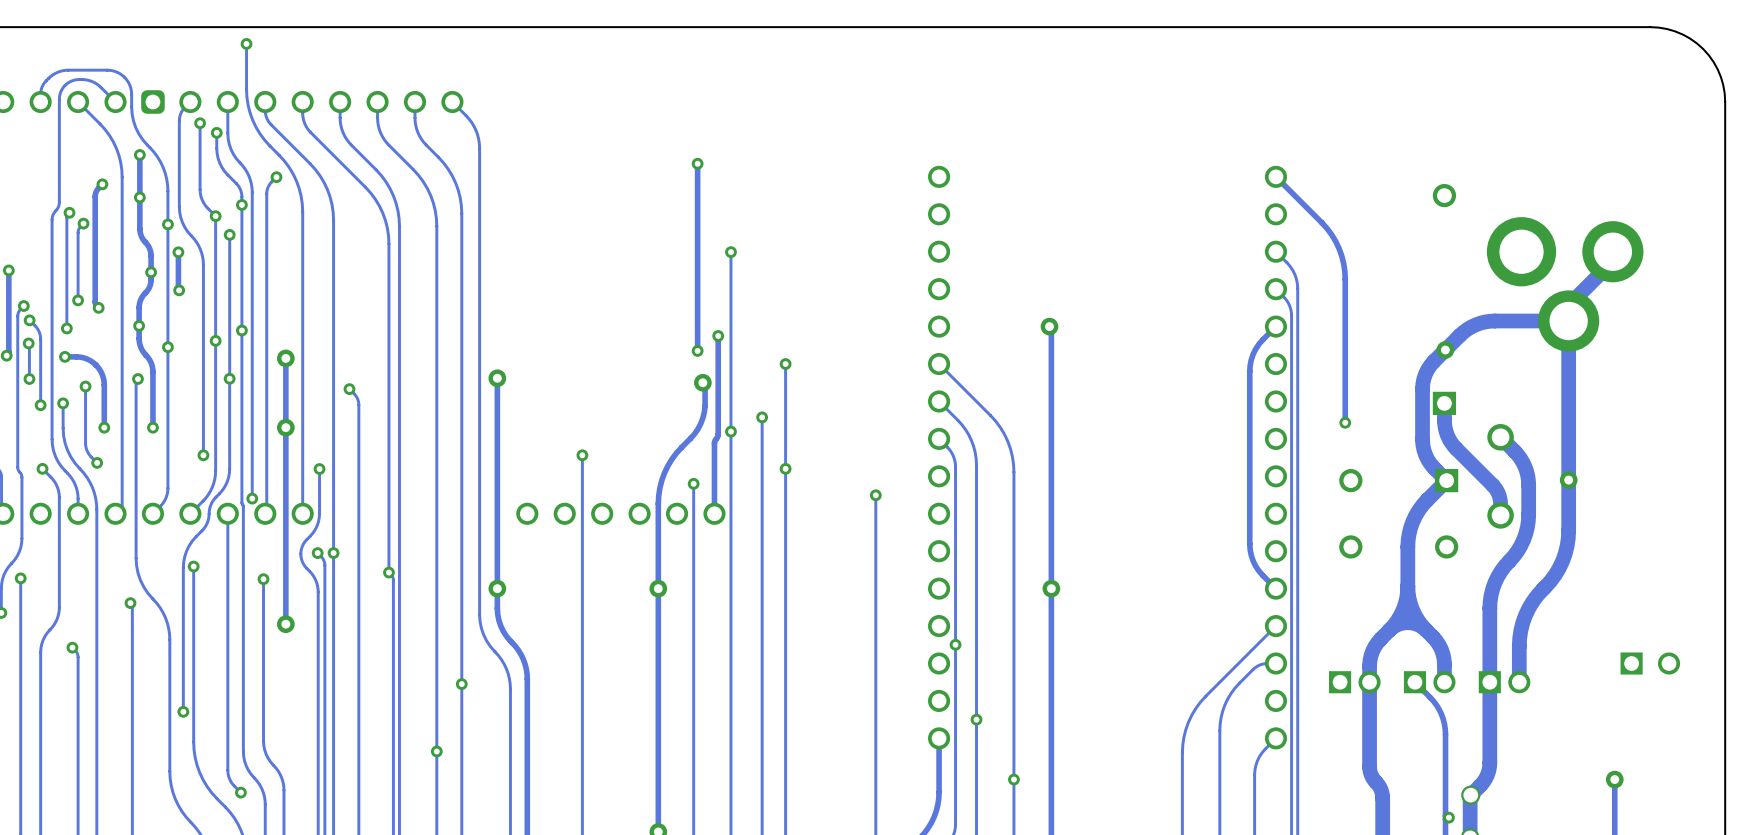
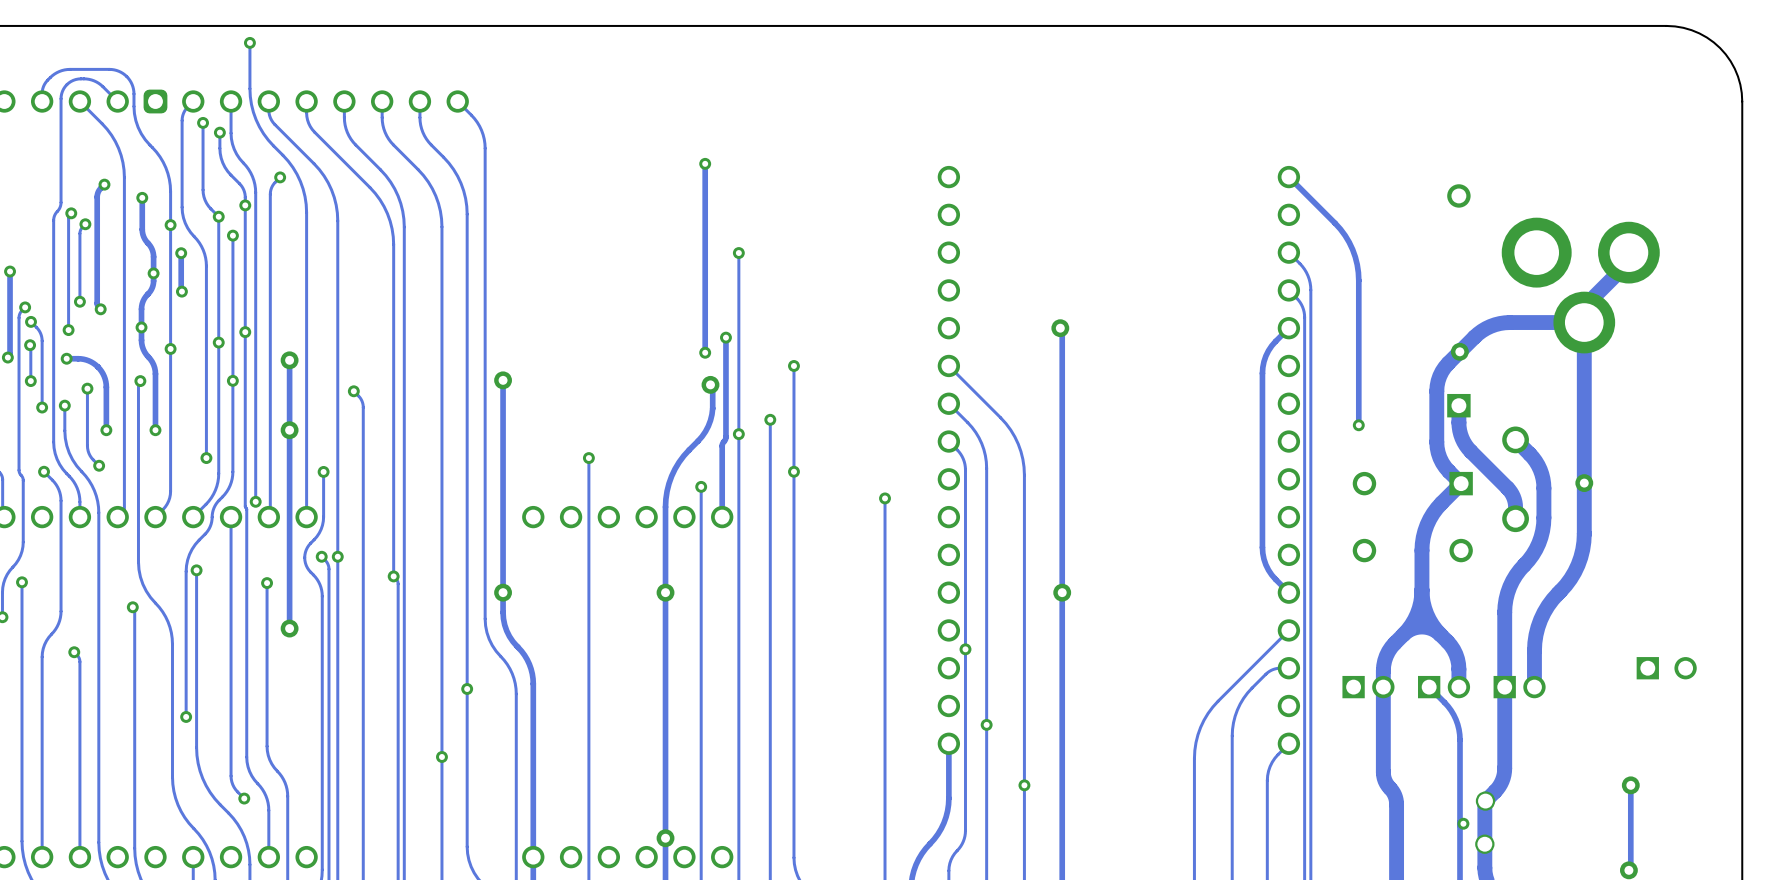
track: (139, 154) (139, 197) -> none
via: (139, 154) -> none

